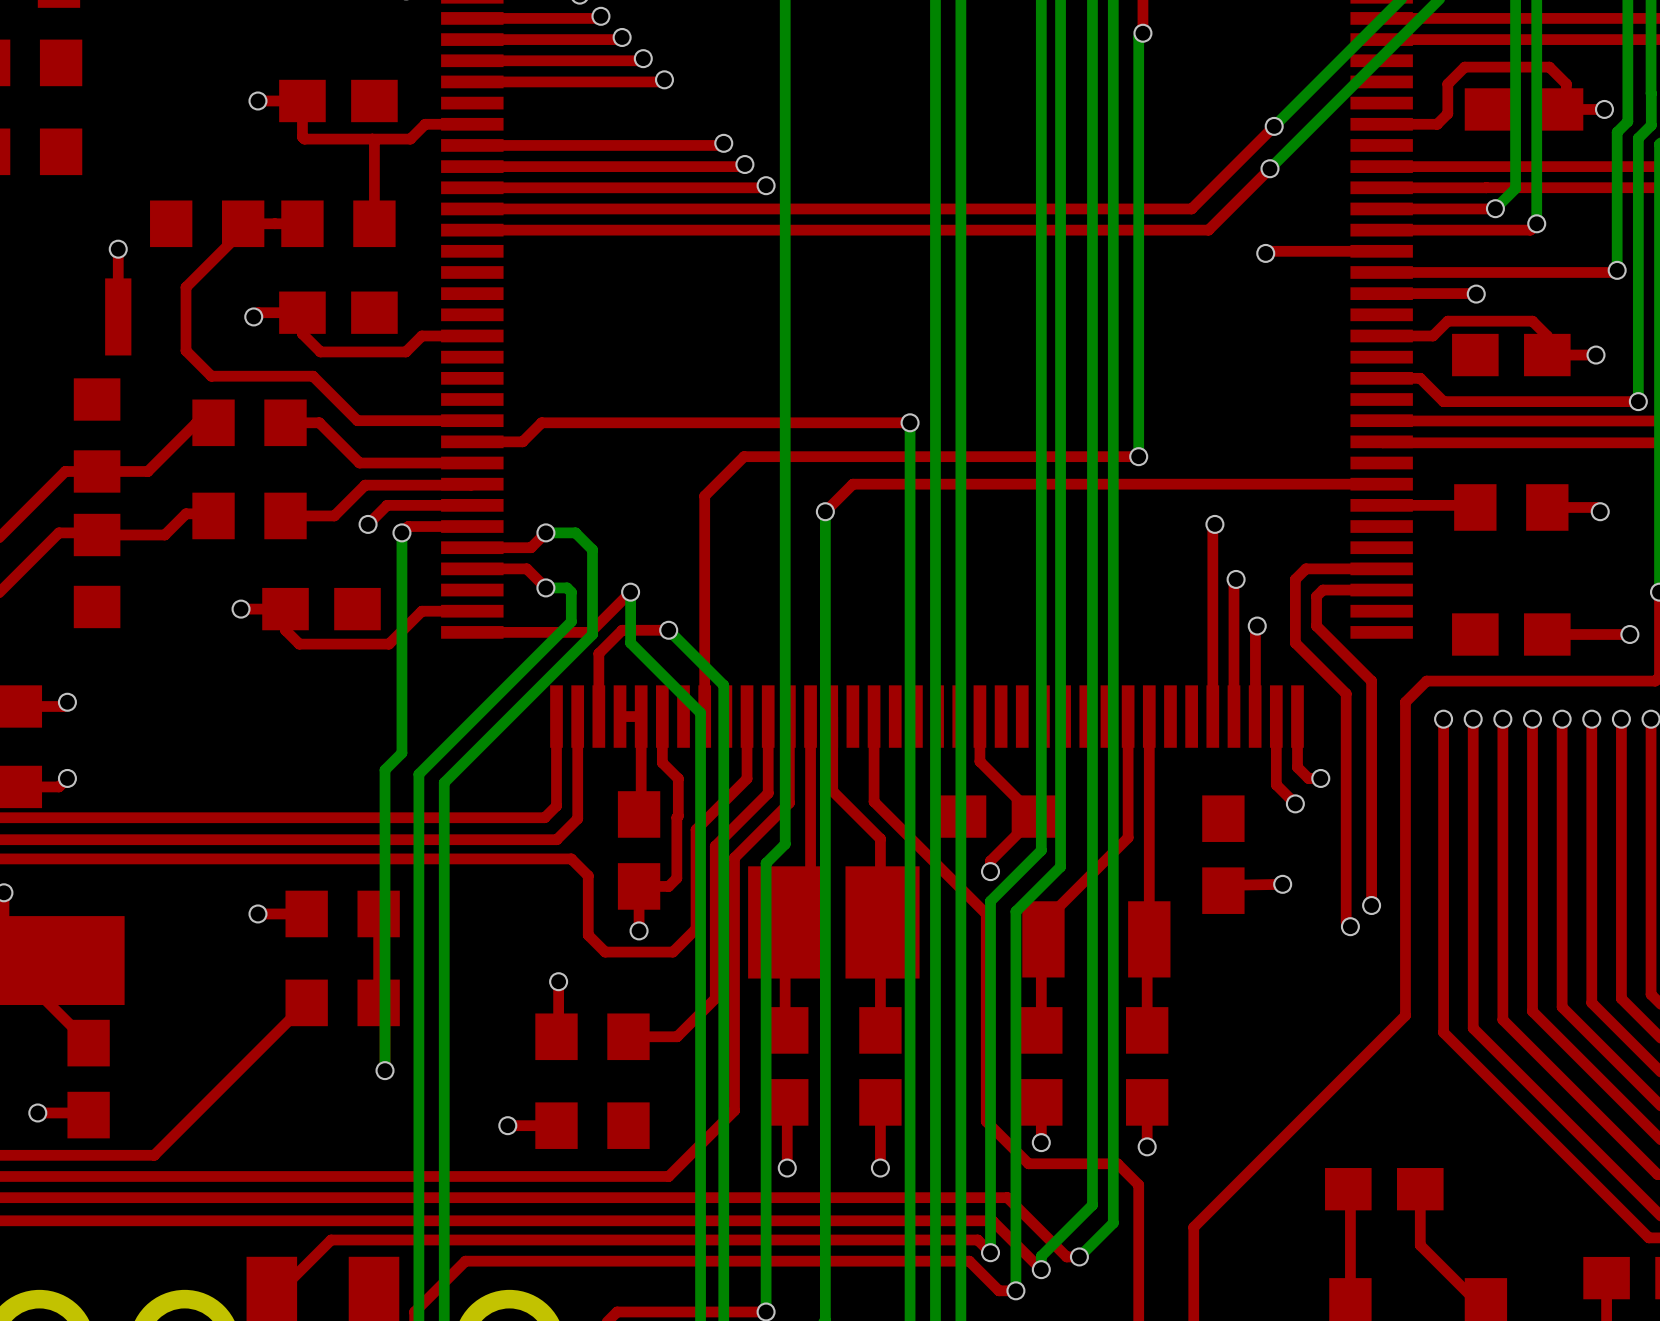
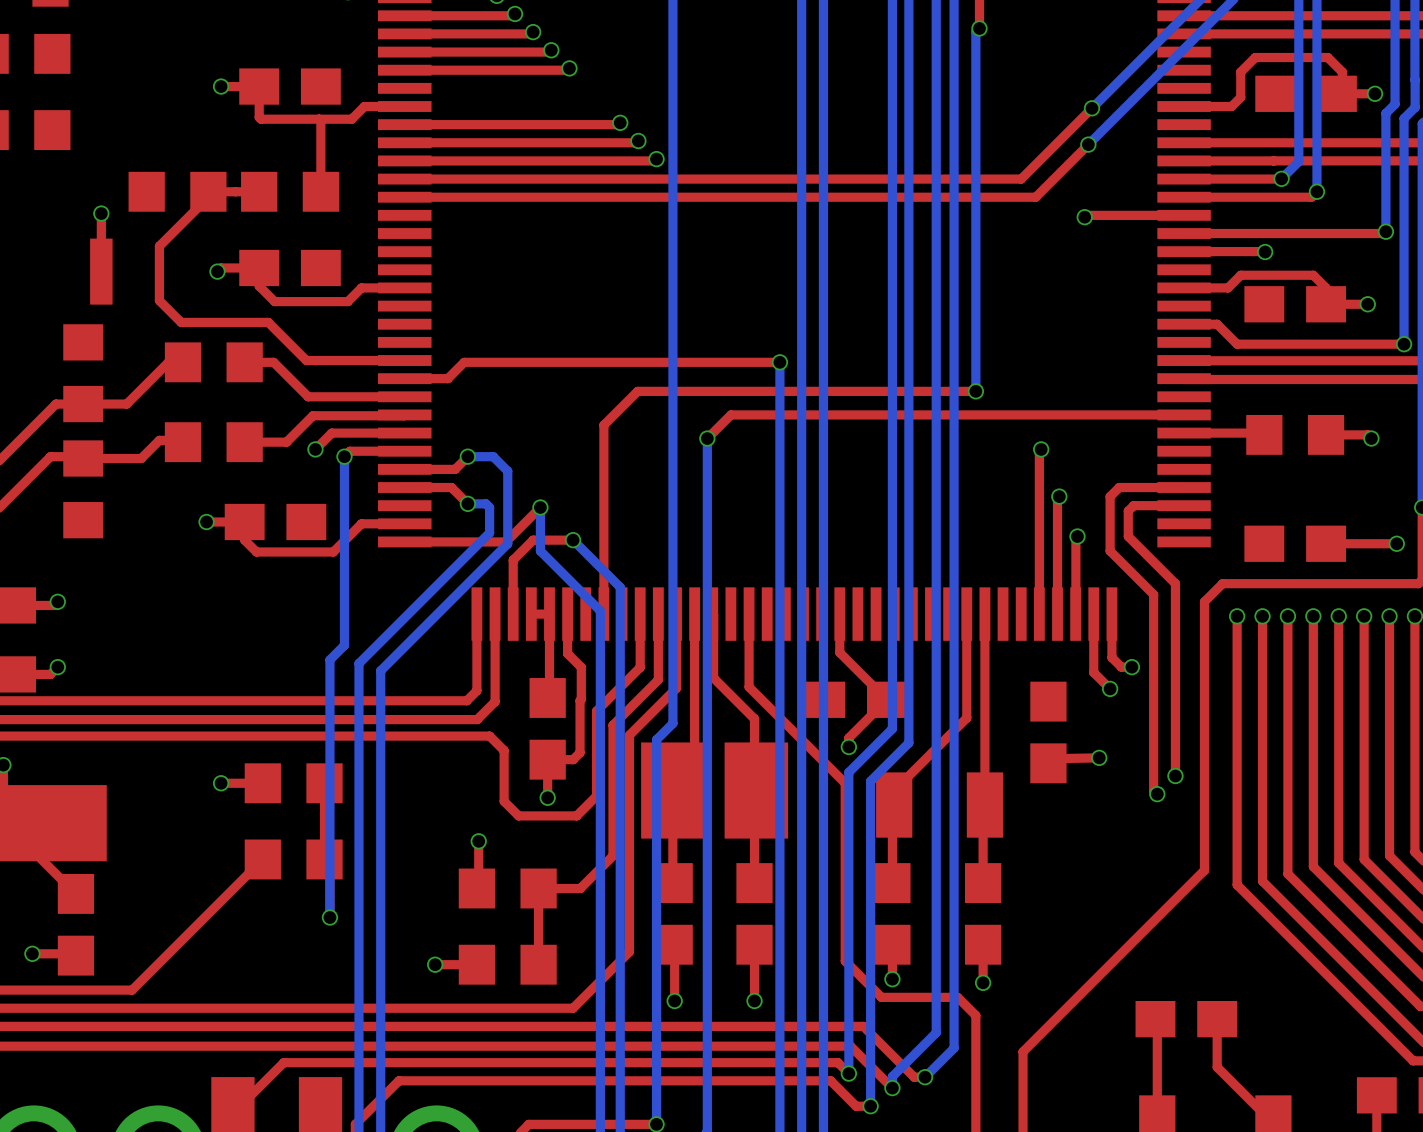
top track: none -> (538, 888) (538, 964)

